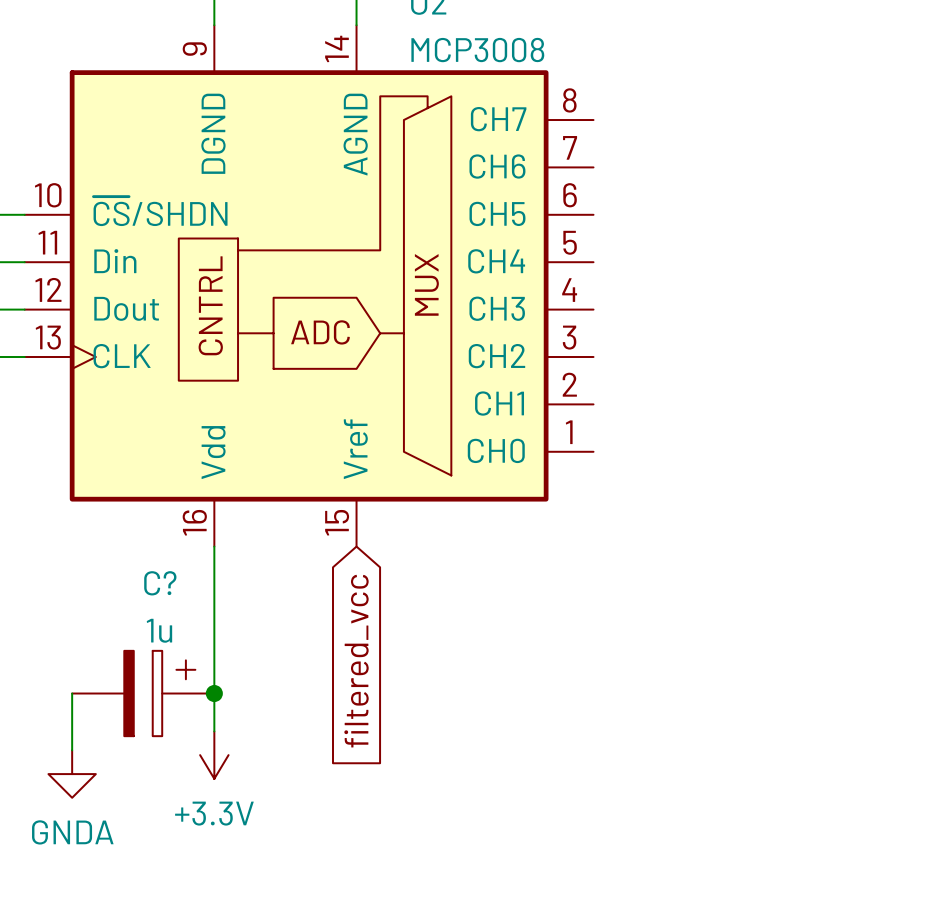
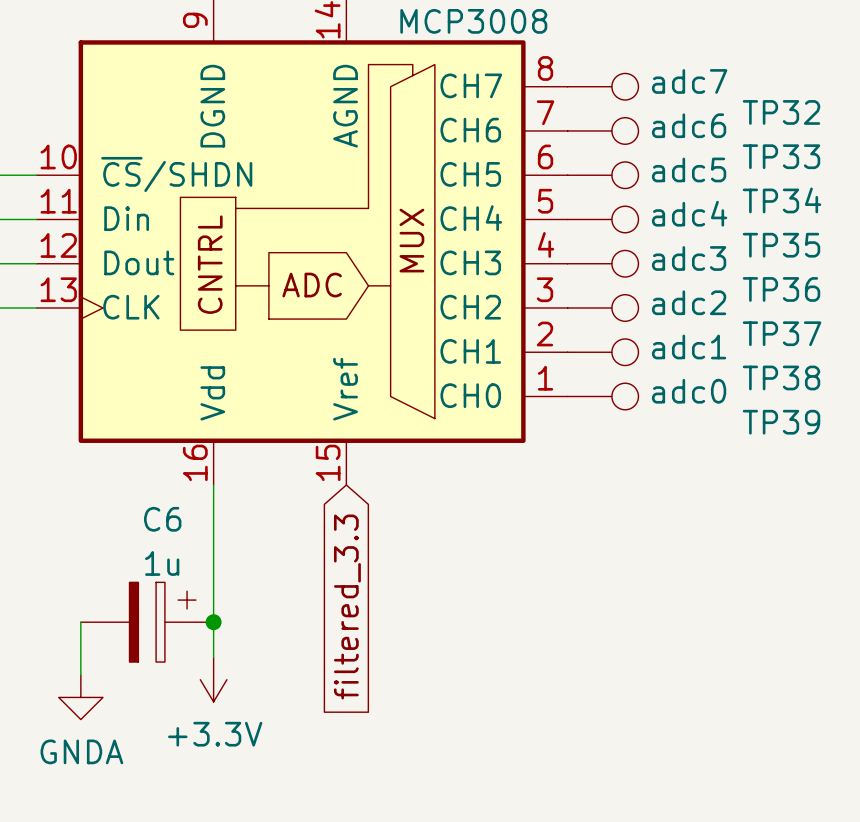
TP32: none -> adc7 (603, 86)
TP33: none -> adc6 (603, 130)
TP34: none -> adc5 (603, 175)
TP35: none -> adc4 (603, 219)
TP36: none -> adc3 (603, 263)
TP37: none -> adc2 (603, 307)
TP38: none -> adc1 (603, 352)
TP39: none -> adc0 (603, 396)
C? name: C? (160, 583) -> C6 (162, 519)
global label: filtered_vcc (356, 661) -> filtered_3.3 (347, 607)

